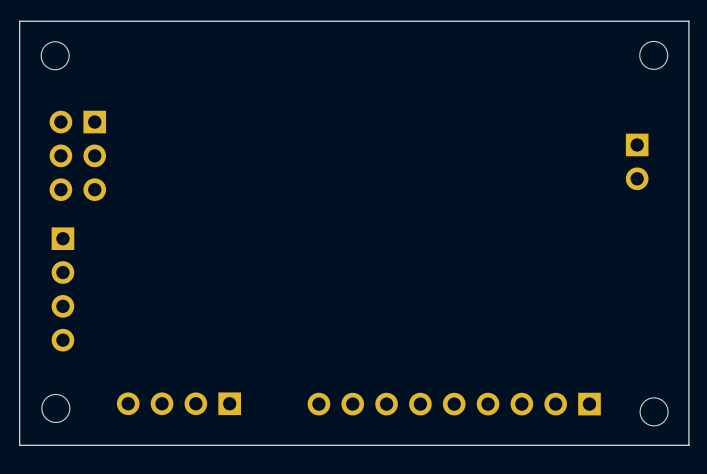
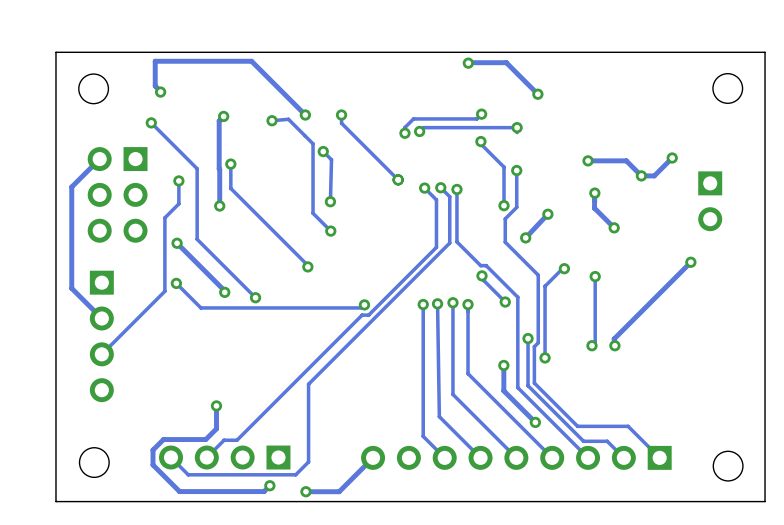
track: none -> (468, 62) (506, 62) (537, 94)
via: none -> (468, 63)
track: none -> (160, 91) (155, 85) (155, 61) (251, 61) (305, 115)
via: none -> (160, 92)
via: none -> (537, 94)
track: none -> (481, 114) (476, 118) (413, 118) (404, 127) (404, 133)
via: none -> (481, 114)
via: none -> (305, 115)
track: none -> (341, 115) (341, 123) (398, 179)
via: none -> (341, 115)
track: none -> (223, 116) (219, 120) (219, 206)
via: none -> (223, 116)
track: none -> (273, 119) (272, 120) (288, 119) (313, 143) (313, 213) (330, 231)
via: none -> (272, 120)
track: none -> (151, 122) (197, 168) (197, 239) (255, 297) (253, 298)
via: none -> (151, 122)
via: none -> (517, 127)
track: none -> (419, 131) (423, 127) (517, 127) (517, 132)
via: none -> (419, 131)
via: none -> (404, 133)
track: none -> (480, 141) (480, 144) (504, 167) (504, 205)
via: none -> (480, 141)
track: none -> (323, 151) (331, 159) (330, 201) (331, 200)
via: none -> (323, 151)
track: none -> (672, 158) (654, 175) (641, 175) (626, 160) (588, 160)
via: none -> (672, 158)
track: none -> (99, 159) (71, 187) (71, 288) (101, 318)
via: none -> (588, 160)
track: none -> (230, 164) (230, 188) (310, 268)
via: none -> (230, 164)
track: none -> (516, 170) (516, 207) (505, 218) (505, 242) (538, 275) (538, 342) (534, 346) (534, 383) (577, 426) (628, 426) (659, 457)
via: none -> (516, 170)
via: none -> (641, 175)
via: none -> (398, 179)
track: none -> (178, 180) (178, 203) (164, 217) (164, 291) (101, 354)
via: none -> (178, 180)
track: none -> (424, 188) (436, 199) (436, 247) (368, 315) (362, 315) (237, 440) (224, 440) (206, 457)
via: none -> (424, 188)
track: none -> (440, 187) (449, 196) (449, 243) (308, 384) (308, 461) (295, 474) (188, 474) (170, 457)
via: none -> (440, 187)
track: none -> (456, 189) (456, 241) (480, 265) (486, 265) (517, 297) (517, 387) (588, 457)
via: none -> (456, 189)
via: none -> (594, 193)
track: none -> (594, 200) (594, 193) (594, 208) (614, 227)
via: none -> (330, 201)
via: none -> (219, 206)
via: none -> (504, 205)
track: none -> (547, 214) (525, 237)
via: none -> (547, 214)
via: none -> (614, 227)
via: none -> (330, 231)
via: none -> (525, 237)
track: none -> (177, 243) (224, 292)
via: none -> (177, 243)
track: none -> (690, 262) (614, 338) (615, 348)
via: none -> (690, 262)
via: none -> (307, 266)
track: none -> (562, 268) (564, 266) (545, 286) (545, 357)
via: none -> (564, 268)
via: none -> (481, 275)
track: none -> (483, 275) (481, 275) (483, 280) (505, 302)
track: none -> (595, 276) (595, 342) (591, 345)
via: none -> (595, 276)
track: none -> (176, 283) (200, 307) (362, 307) (366, 303)
via: none -> (176, 283)
via: none -> (224, 292)
via: none -> (255, 297)
via: none -> (505, 302)
track: none -> (452, 302) (452, 394) (516, 457)
via: none -> (452, 302)
via: none -> (437, 303)
via: none -> (364, 304)
track: none -> (423, 304) (423, 436) (444, 457)
via: none -> (423, 304)
track: none -> (439, 304) (437, 303) (439, 416) (480, 457)
track: none -> (468, 304) (468, 373) (552, 457)
via: none -> (468, 304)
track: none -> (528, 338) (528, 385) (583, 441) (607, 441) (623, 457)
via: none -> (528, 338)
via: none -> (591, 345)
via: none -> (614, 345)
via: none -> (545, 357)
track: none -> (503, 365) (503, 390) (535, 422)
via: none -> (503, 365)
track: none -> (216, 405) (216, 428) (205, 439) (163, 439) (153, 450) (153, 464) (179, 491) (264, 491) (269, 485)
via: none -> (216, 405)
via: none -> (535, 422)
track: none -> (373, 457) (339, 491) (305, 491) (305, 490)
via: none -> (269, 485)
via: none -> (305, 491)

